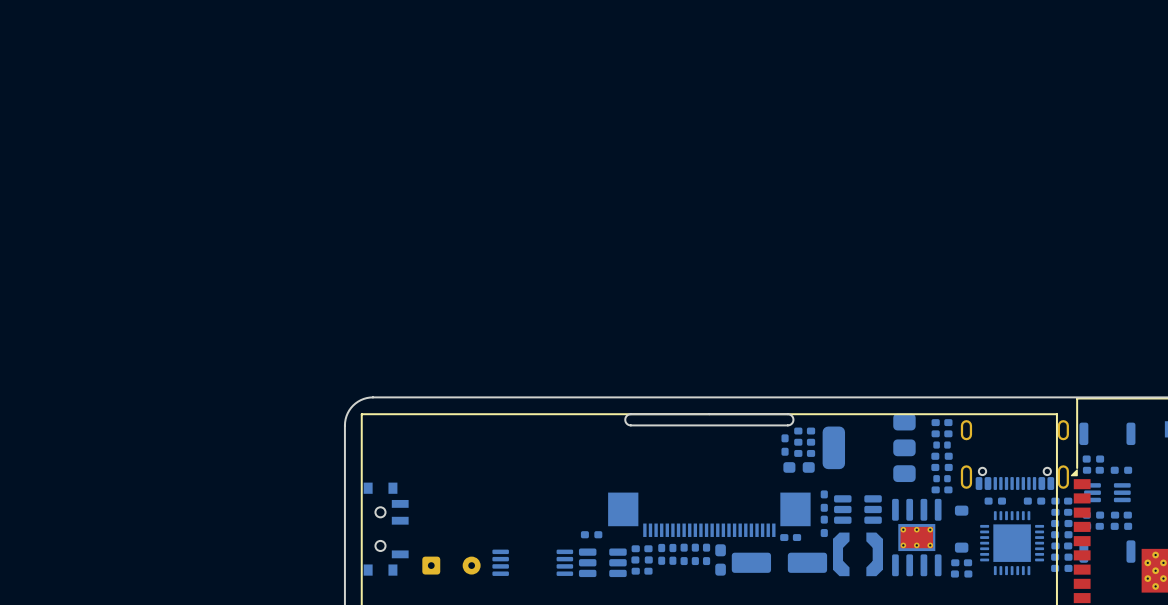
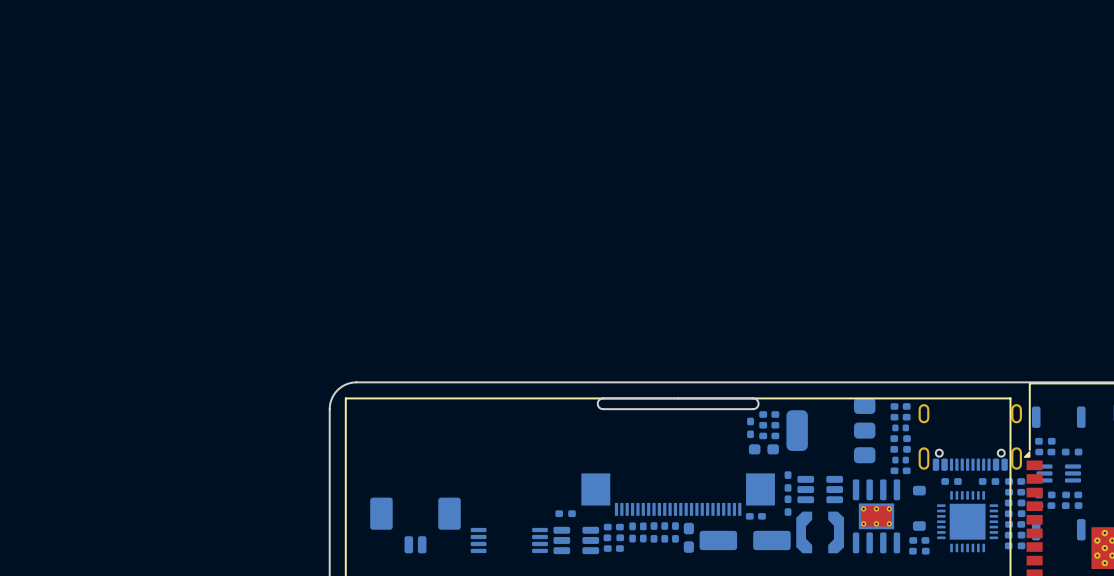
part: (386, 529) -> none
part: none -> (415, 525)
part: (451, 565) -> none

